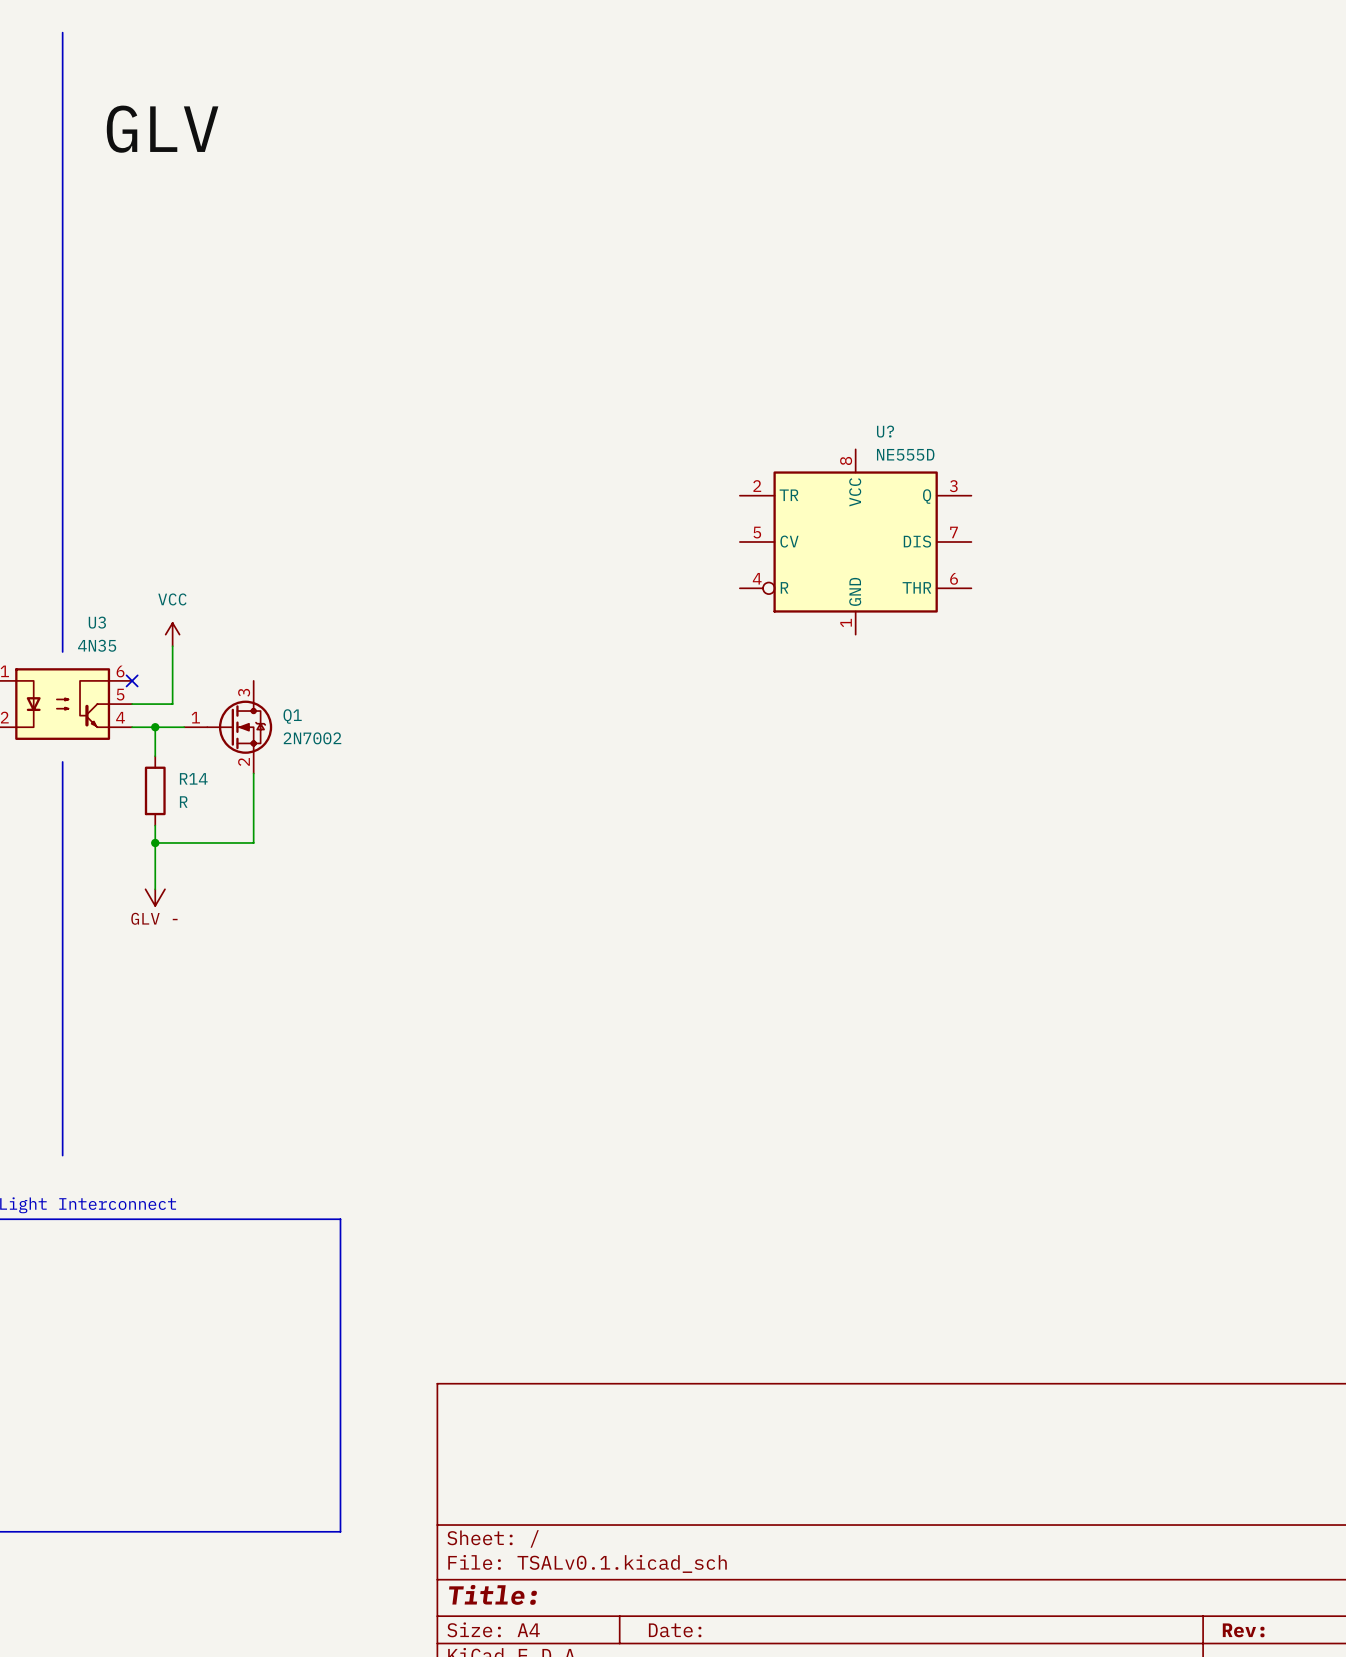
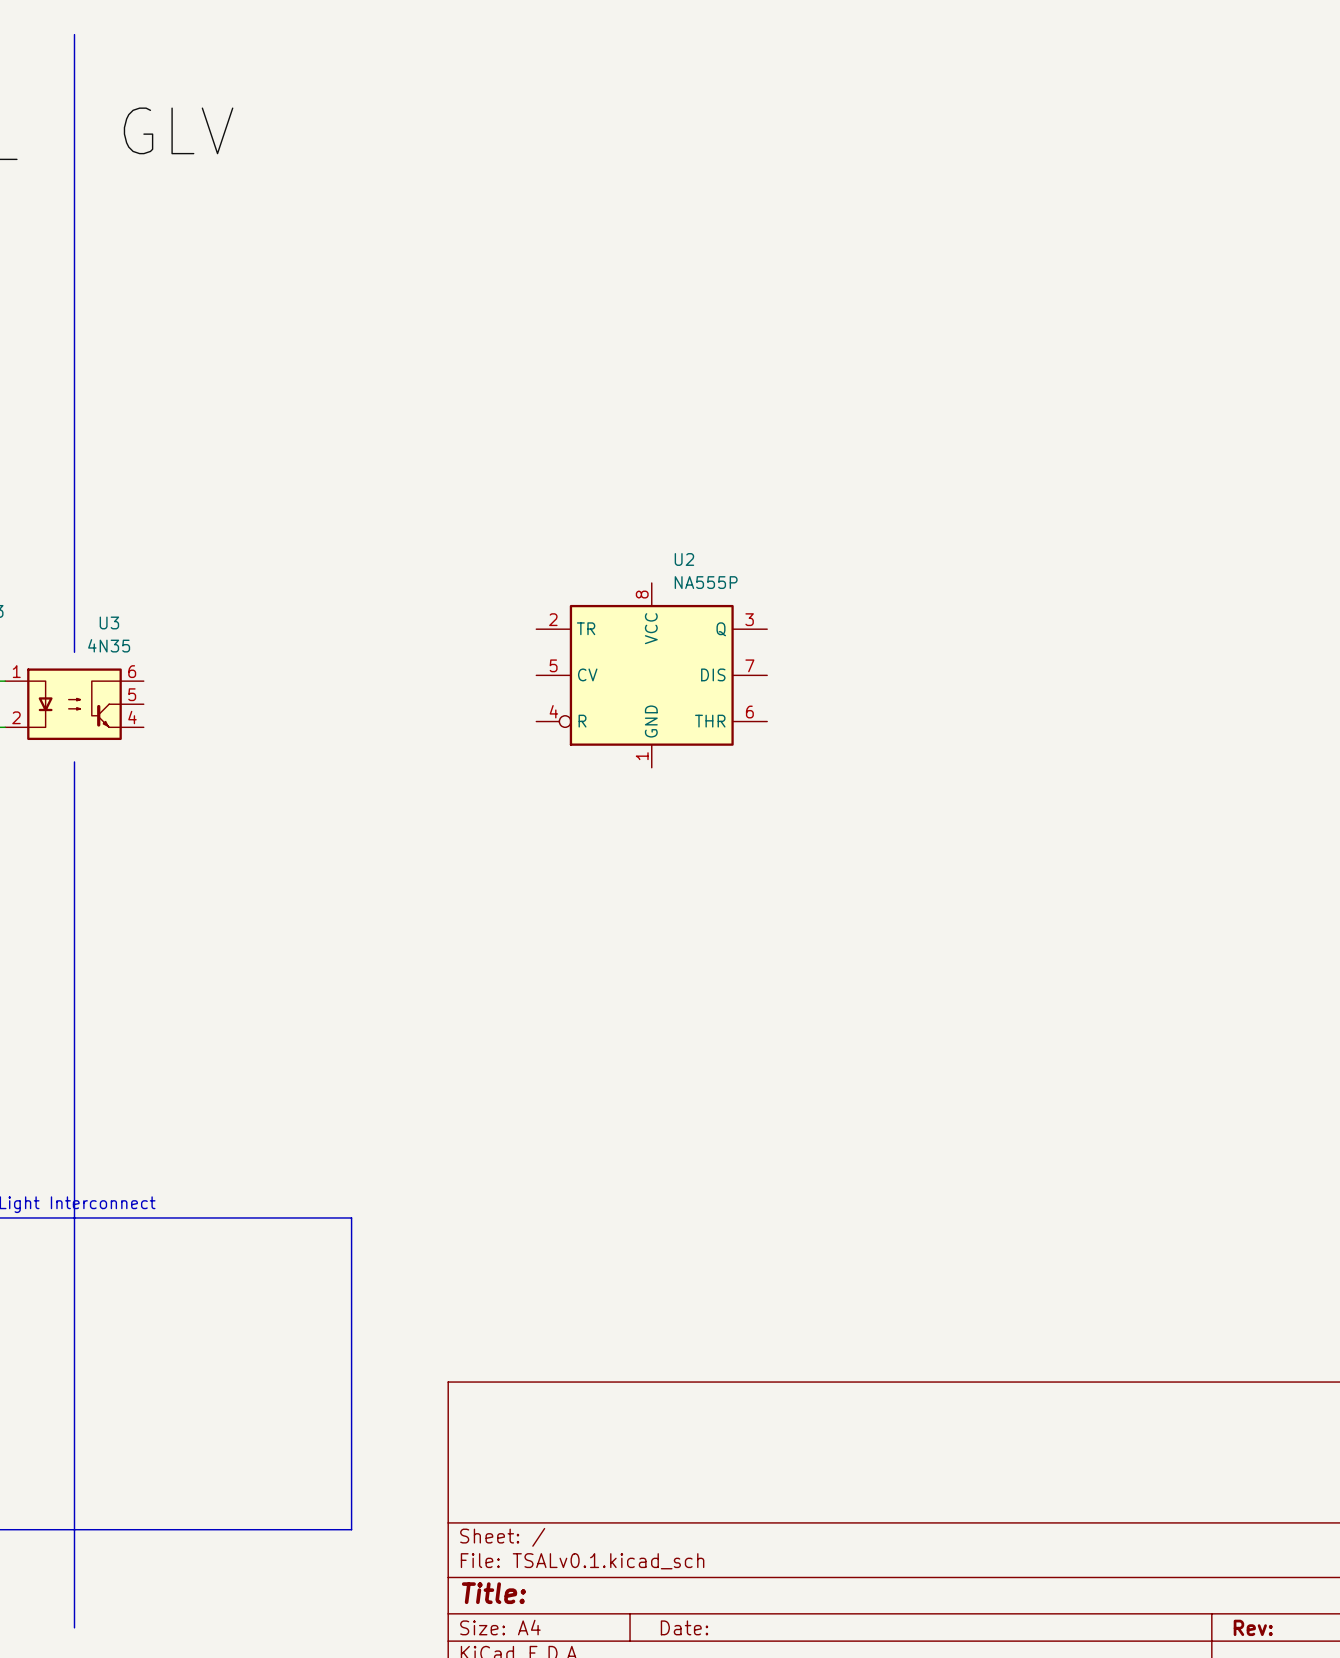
U?: NE555D (855, 542) -> none
power symbol: VCC (172, 634) -> none
wire: (172, 646) (172, 704) (132, 704) -> none
U2: none -> NA555P (651, 675)
no-connect mark: (132, 680) -> none
wire: (132, 727) (184, 727) -> none
wire: (155, 727) (155, 756) -> none
junction: (155, 727) -> none
Q1: 2N7002 (228, 727) -> none
wire: (253, 773) (253, 842) (155, 842) -> none
R14: R (155, 790) -> none
wire: (155, 825) (155, 889) -> none
junction: (155, 842) -> none
power symbol: (155, 897) -> none
line: none -> (74, 1154) (74, 1627)

